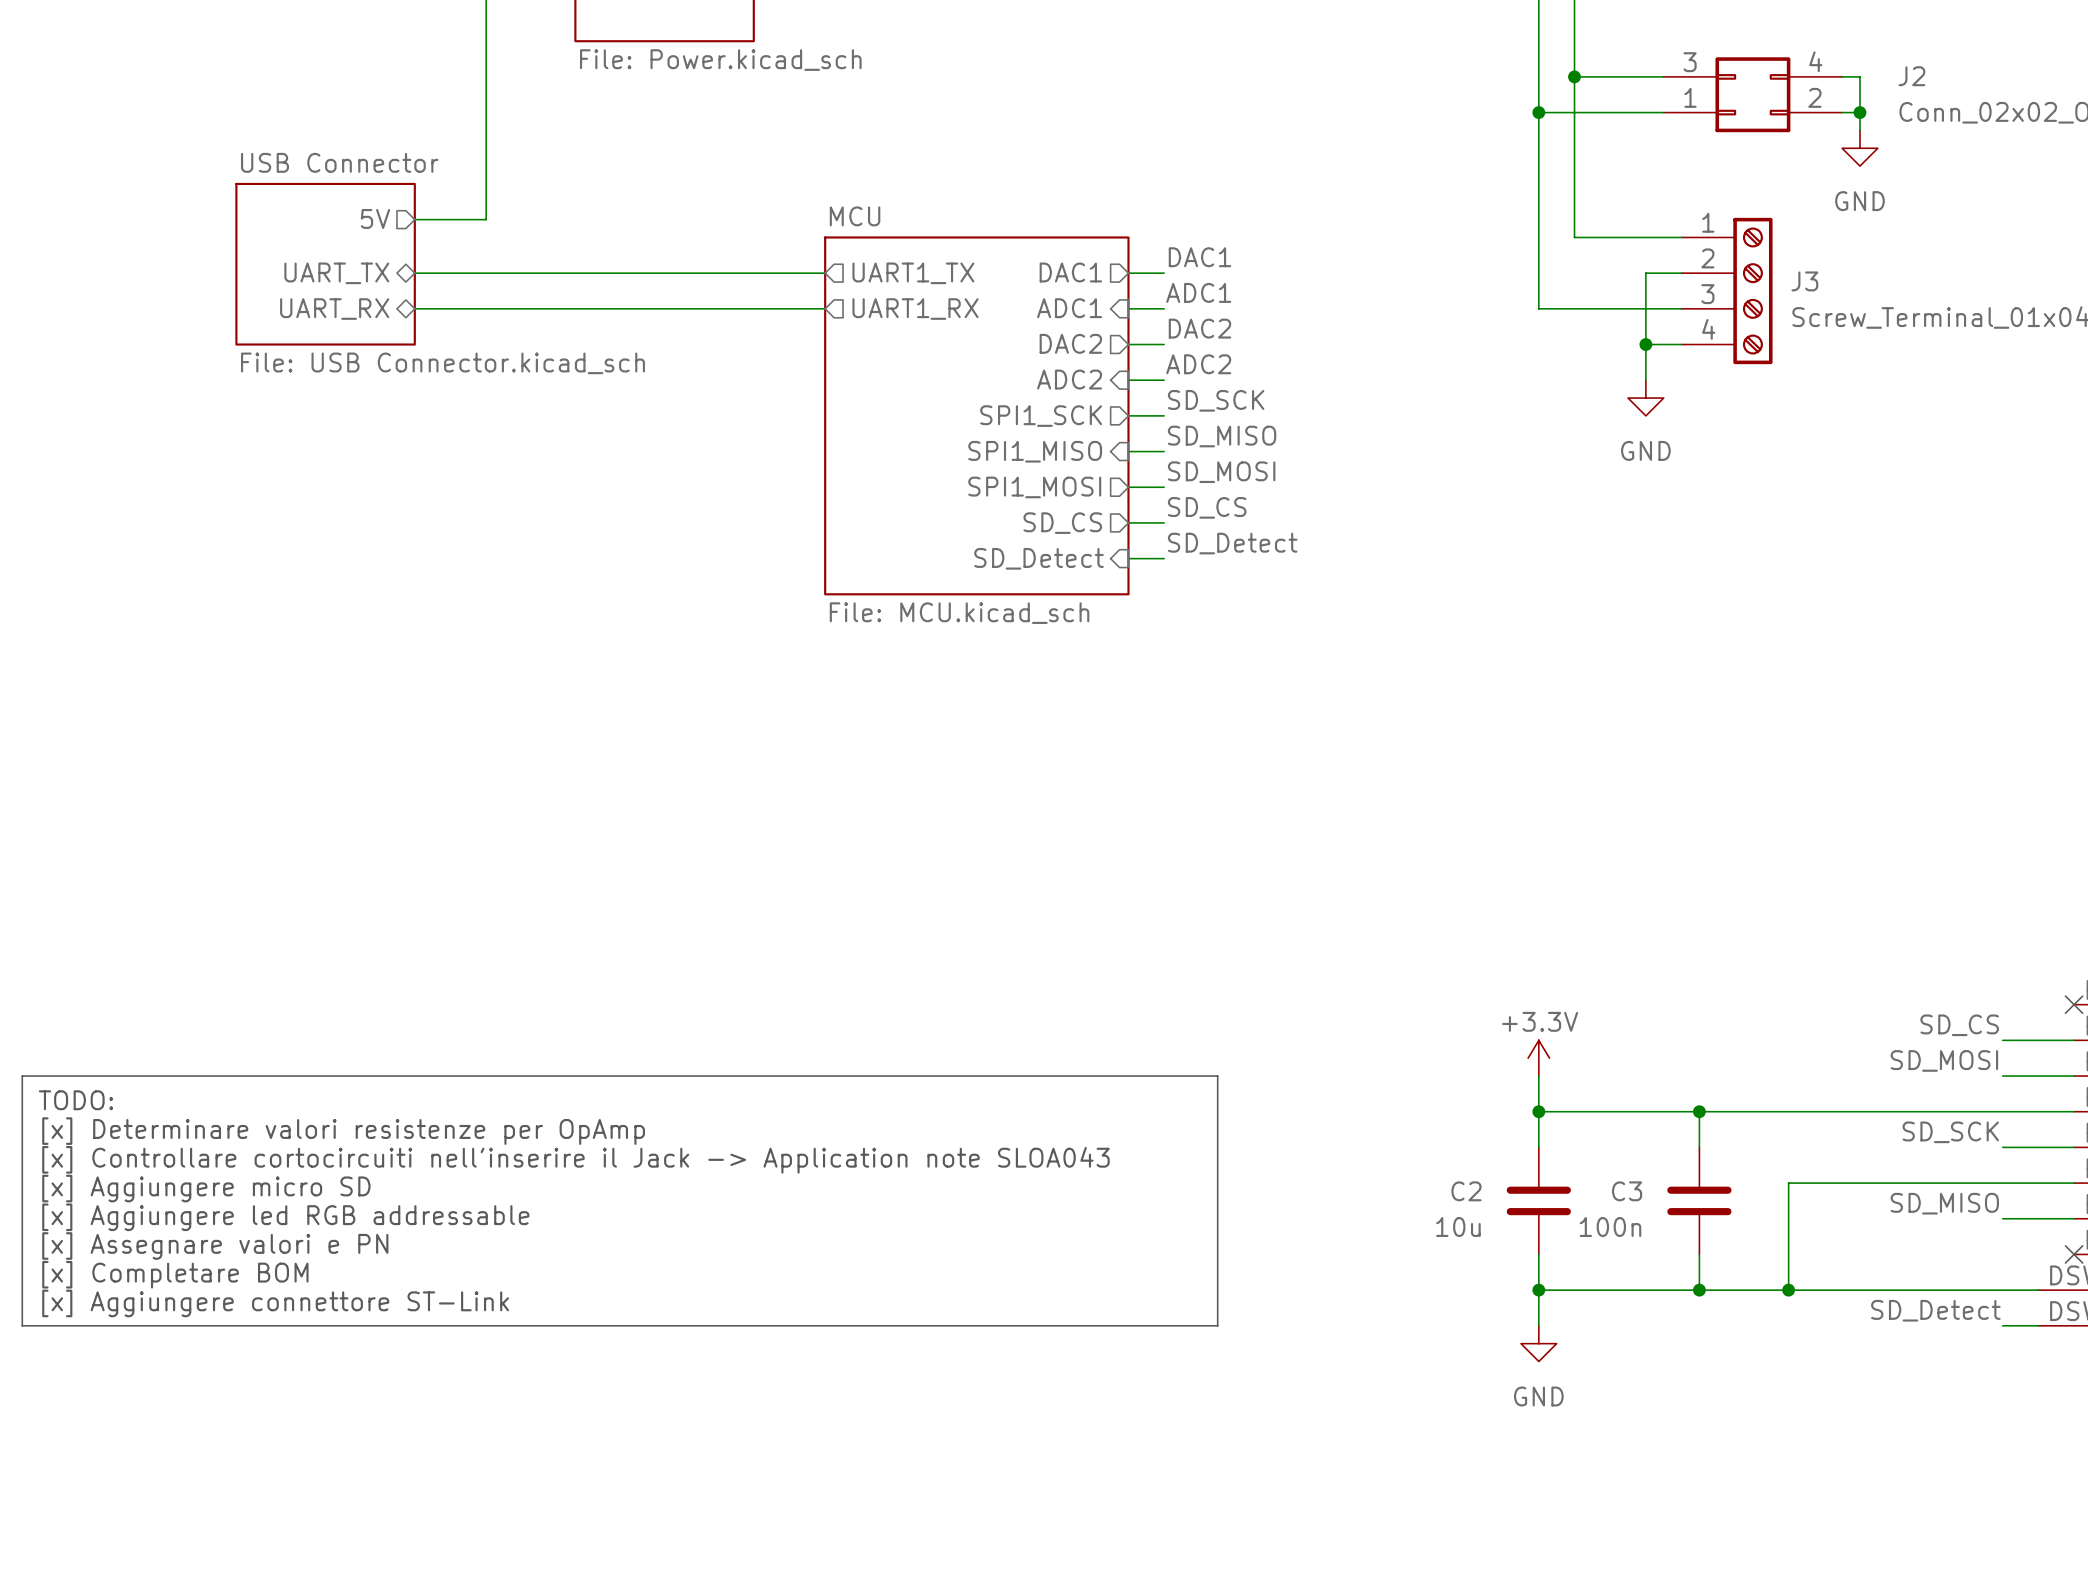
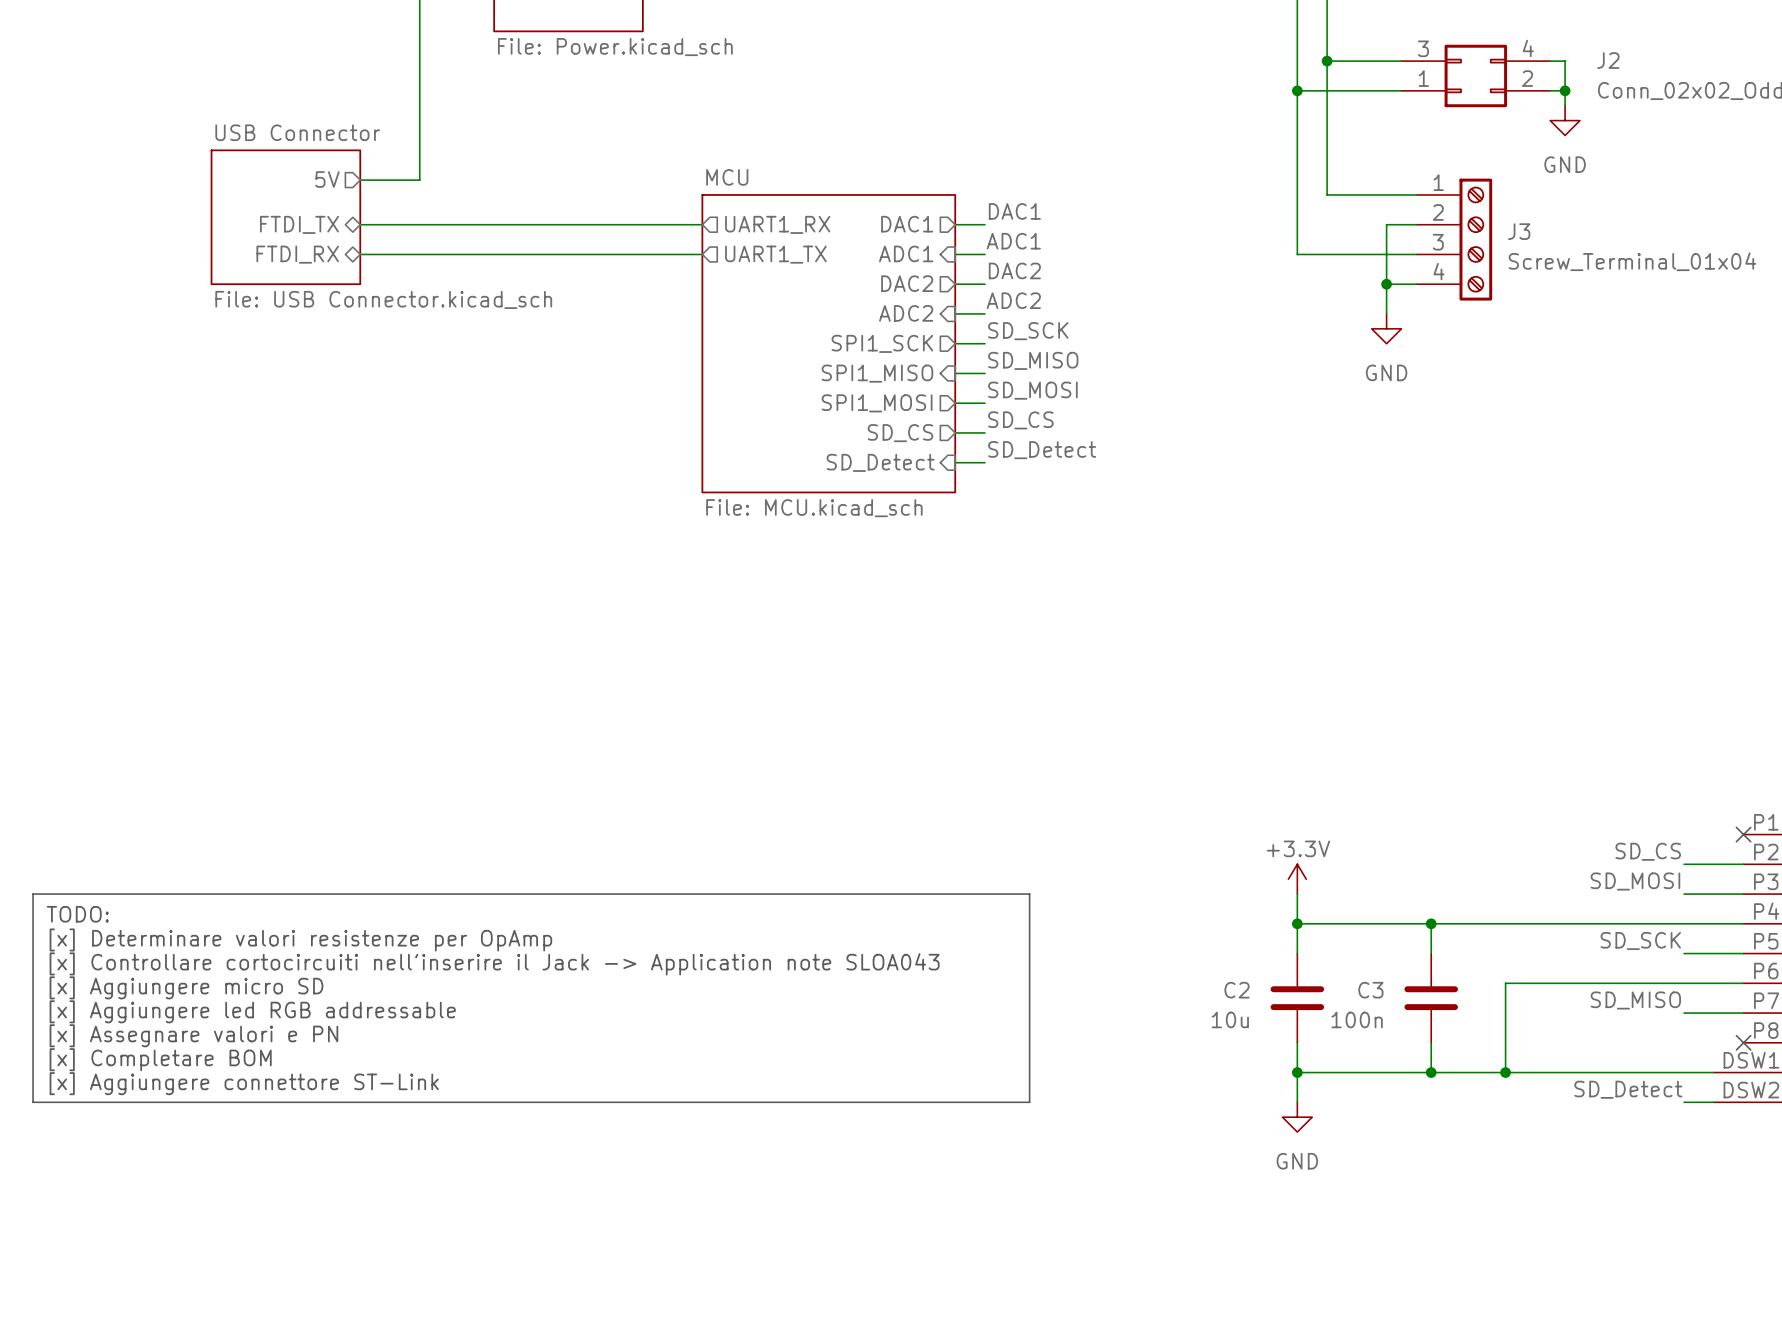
sheet pin: UART_TX (336, 273) -> FTDI_TX (299, 224)
sheet pin: UART1_TX (913, 273) -> UART1_RX (777, 224)
sheet pin: UART_RX (334, 309) -> FTDI_RX (297, 254)
sheet pin: UART1_RX (915, 309) -> UART1_TX (775, 254)

